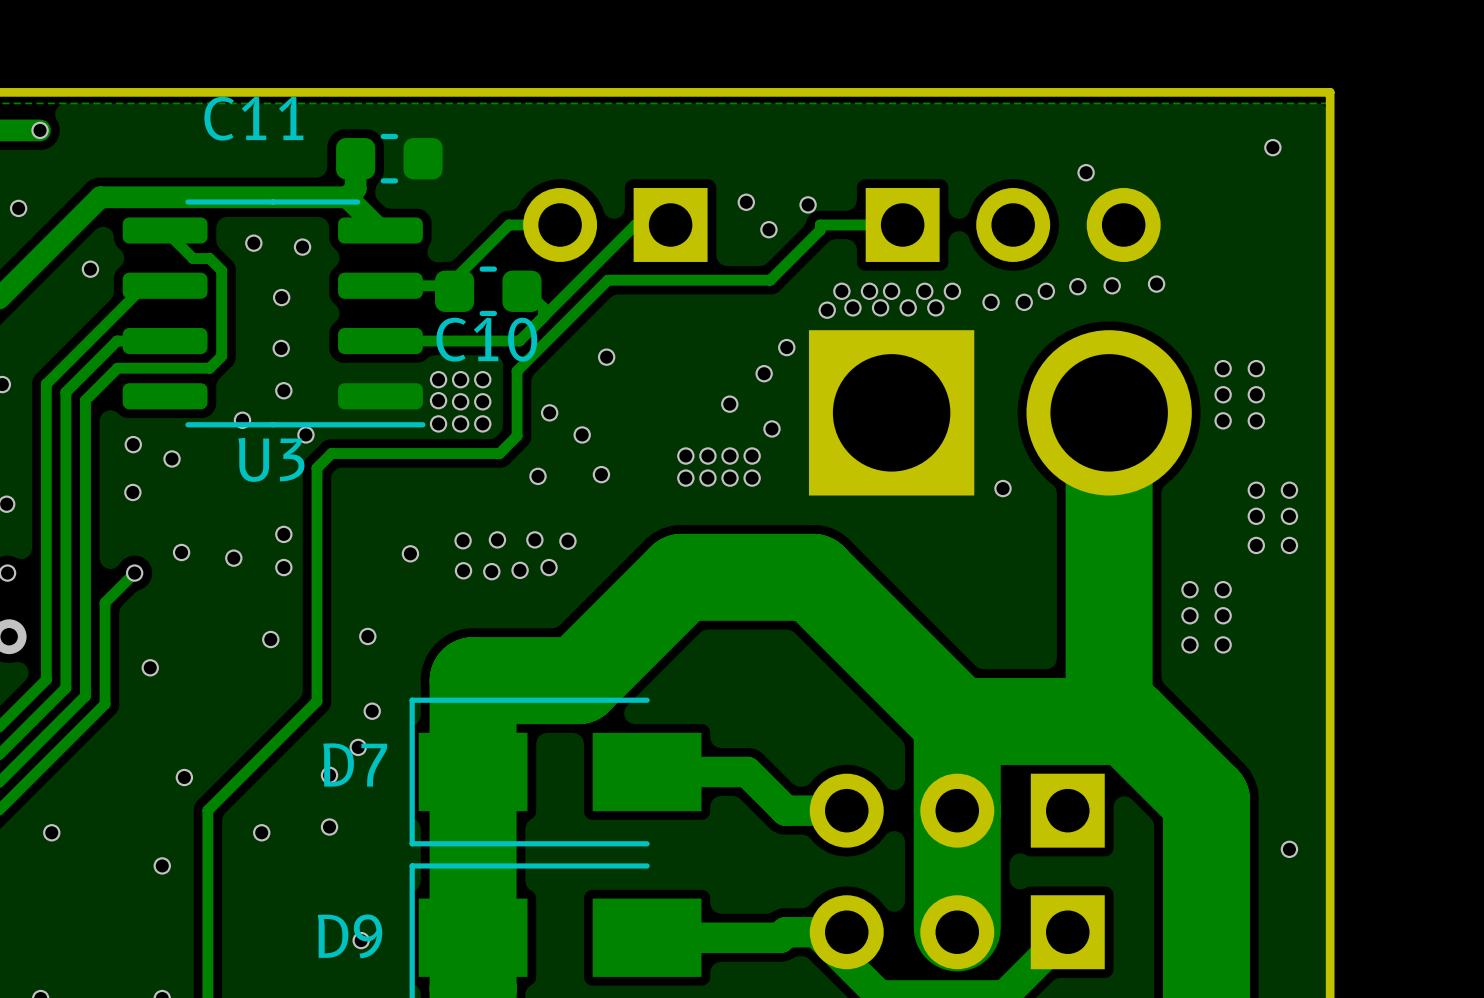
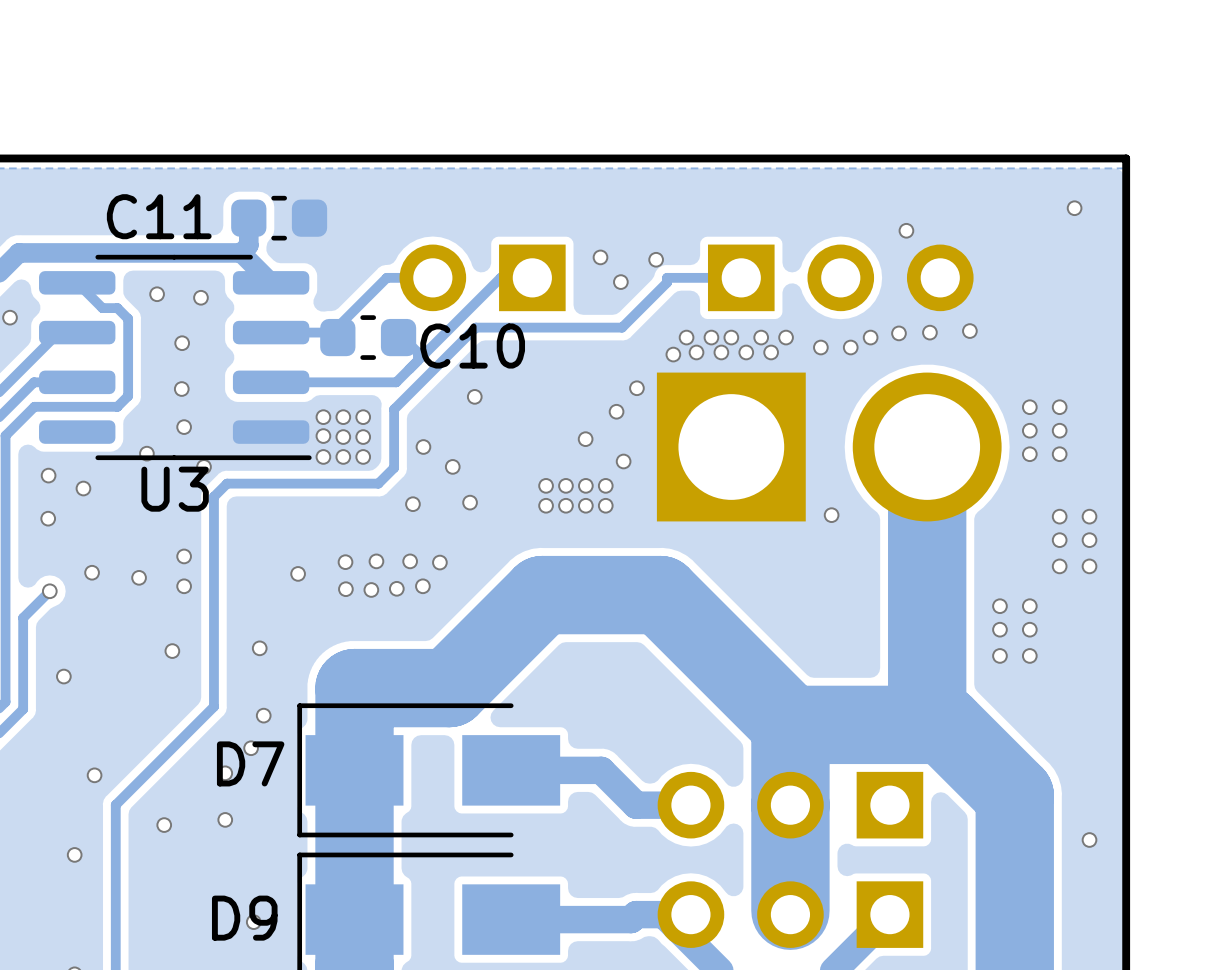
C11 name position: C11 (253, 118) -> C11 (159, 216)
C10 name position: C10 (486, 339) -> C10 (472, 346)

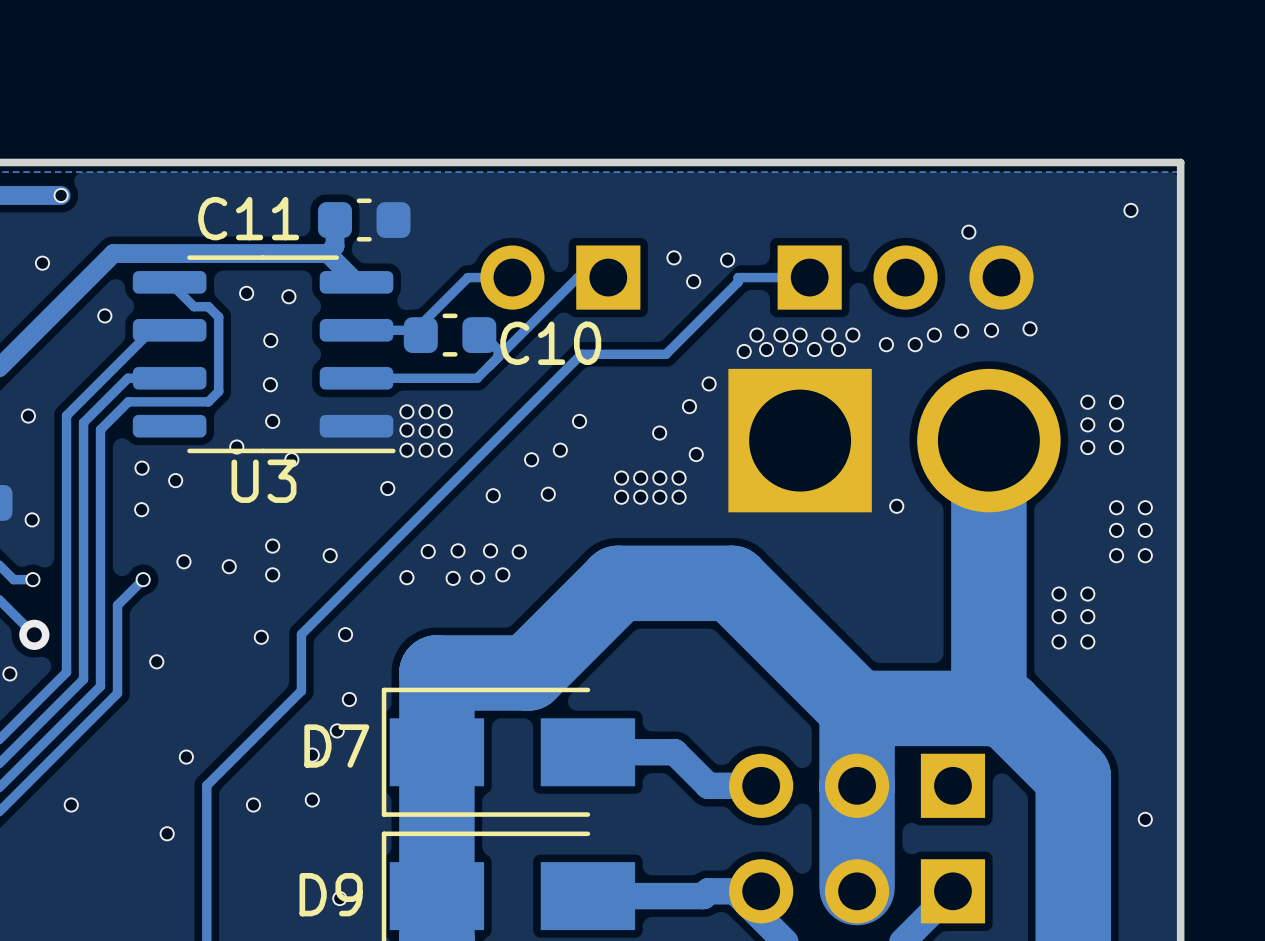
track: (622, 327) (475, 327) (394, 409) (394, 467) -> (694, 325) (666, 354) (581, 354) (475, 460)
via: (474, 396) -> none
via: none -> (579, 421)
via: (423, 447) -> none
via: none -> (560, 450)
track: (378, 483) (227, 483) (213, 496) (213, 648) -> (459, 475) (301, 634)
via: none -> (387, 488)
via: none -> (330, 555)
via: (298, 573) -> none
via: none -> (406, 577)
via: (345, 589) -> none

